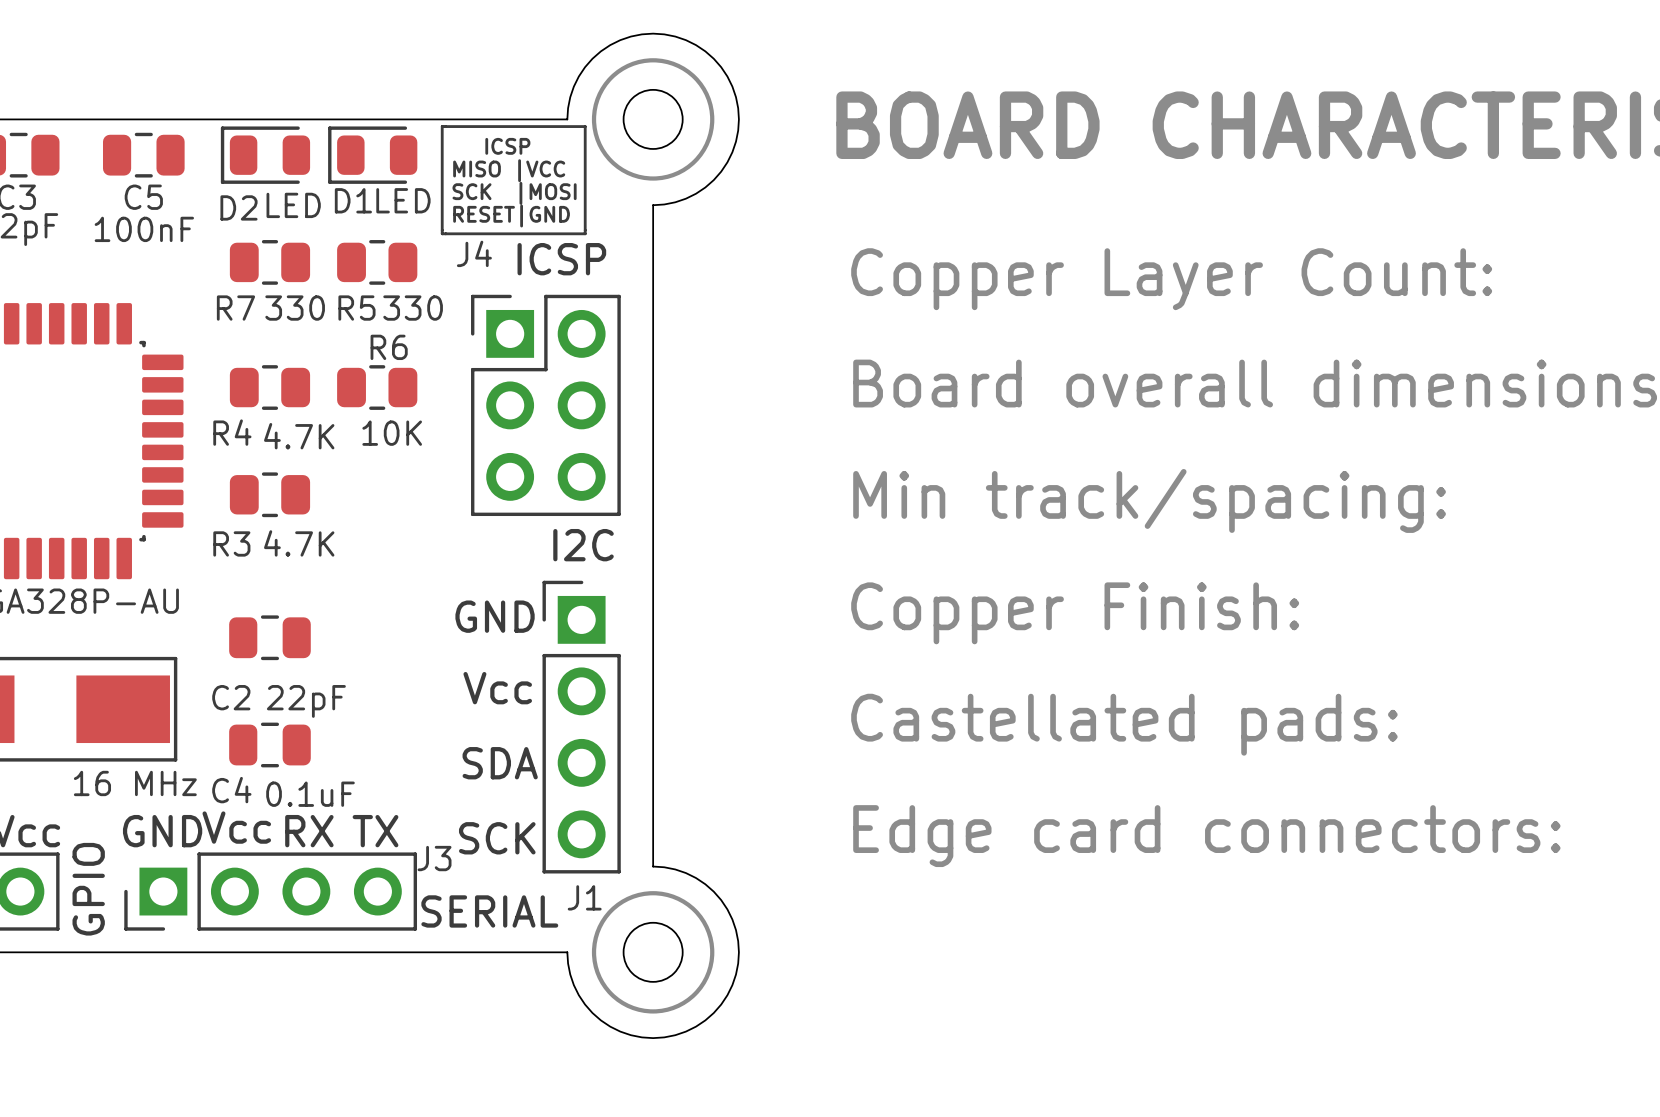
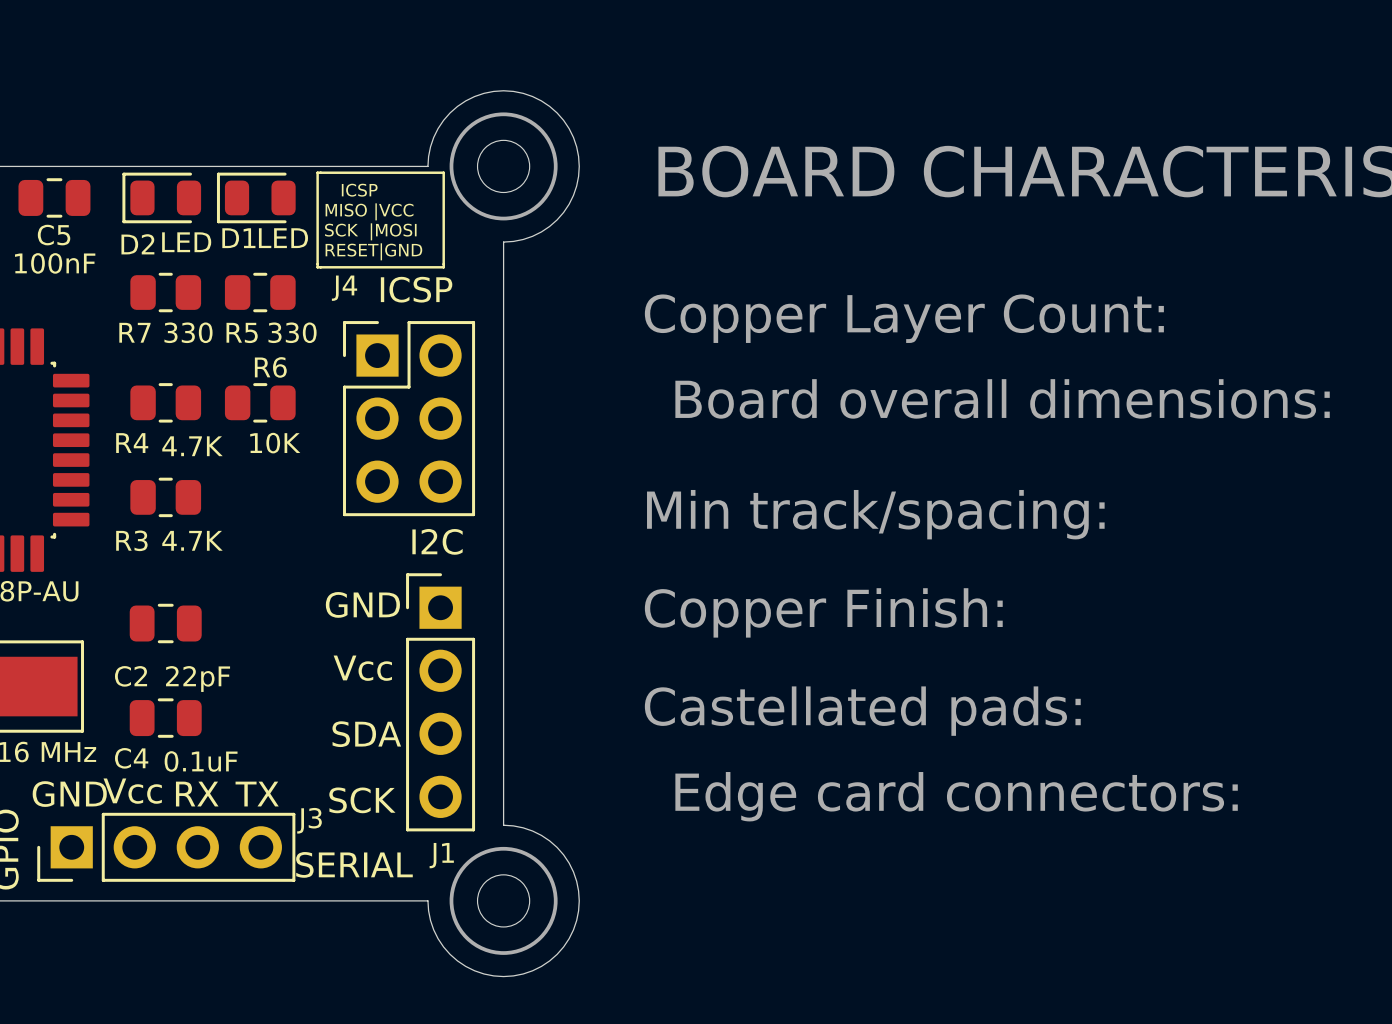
text position: Copper Layer Count: (1171, 279) -> Copper Layer Count: (904, 318)
text position: Min track/spacing: (1149, 500) -> Min track/spacing: (875, 514)
text position: Copper Finish: (1075, 613) -> Copper Finish: (823, 612)
text position: Castellated pads: (1124, 724) -> Castellated pads: (862, 711)

